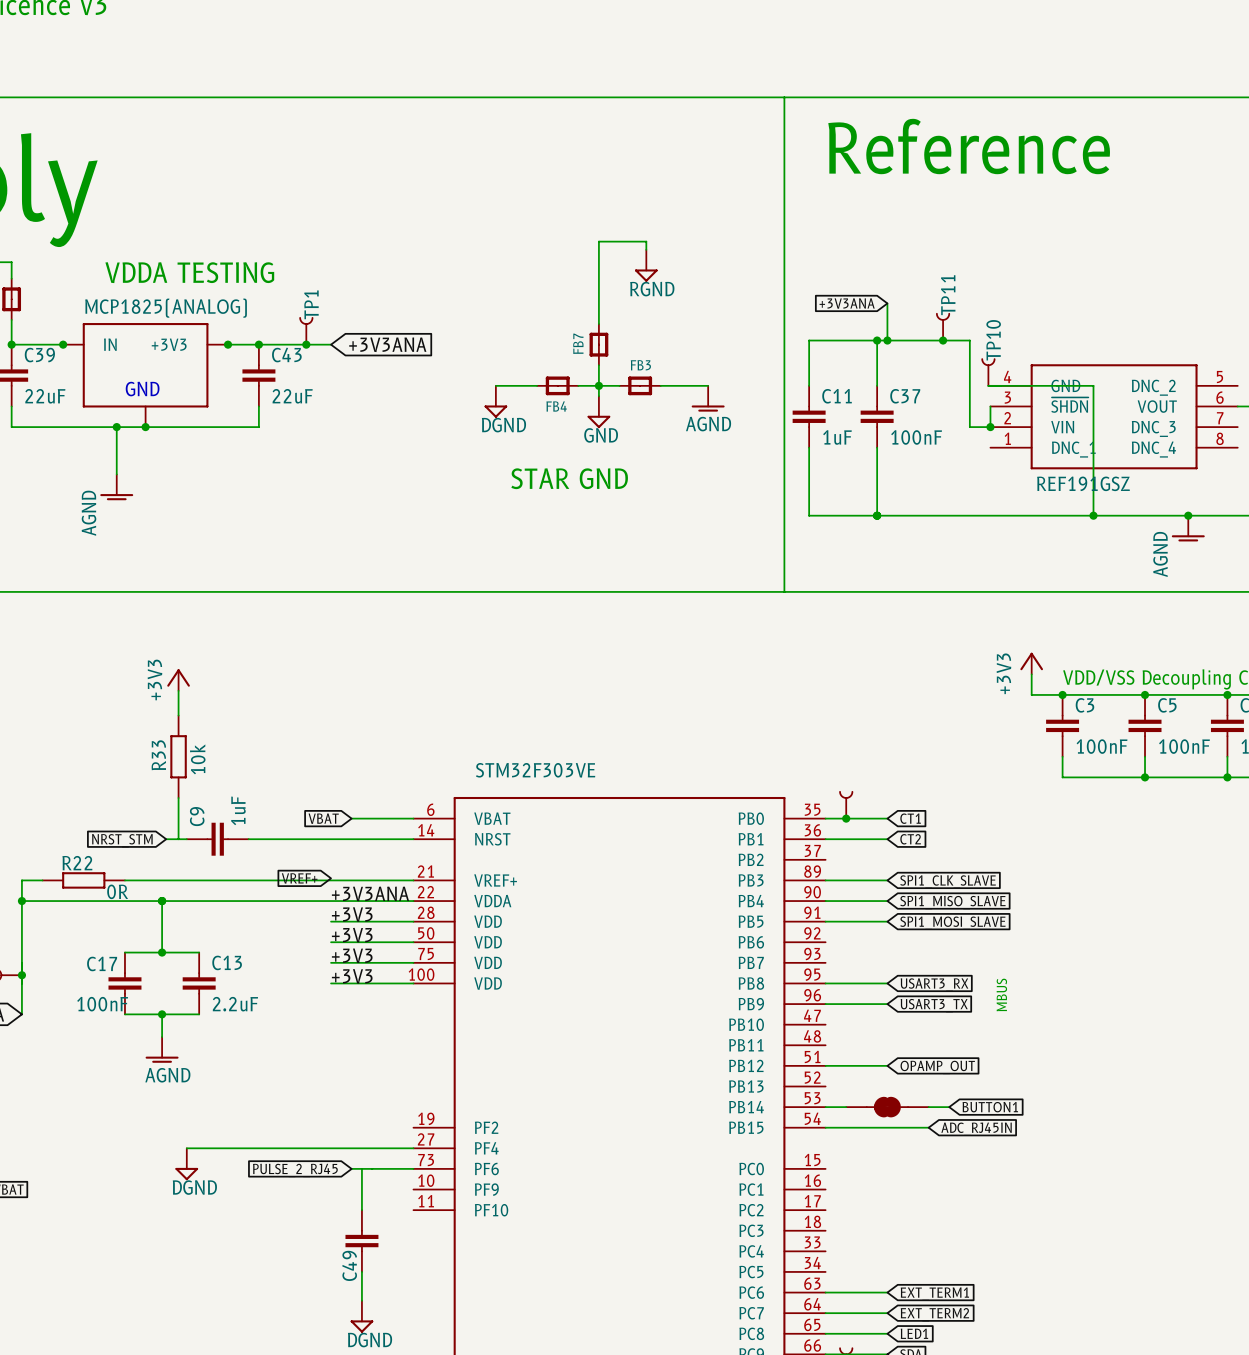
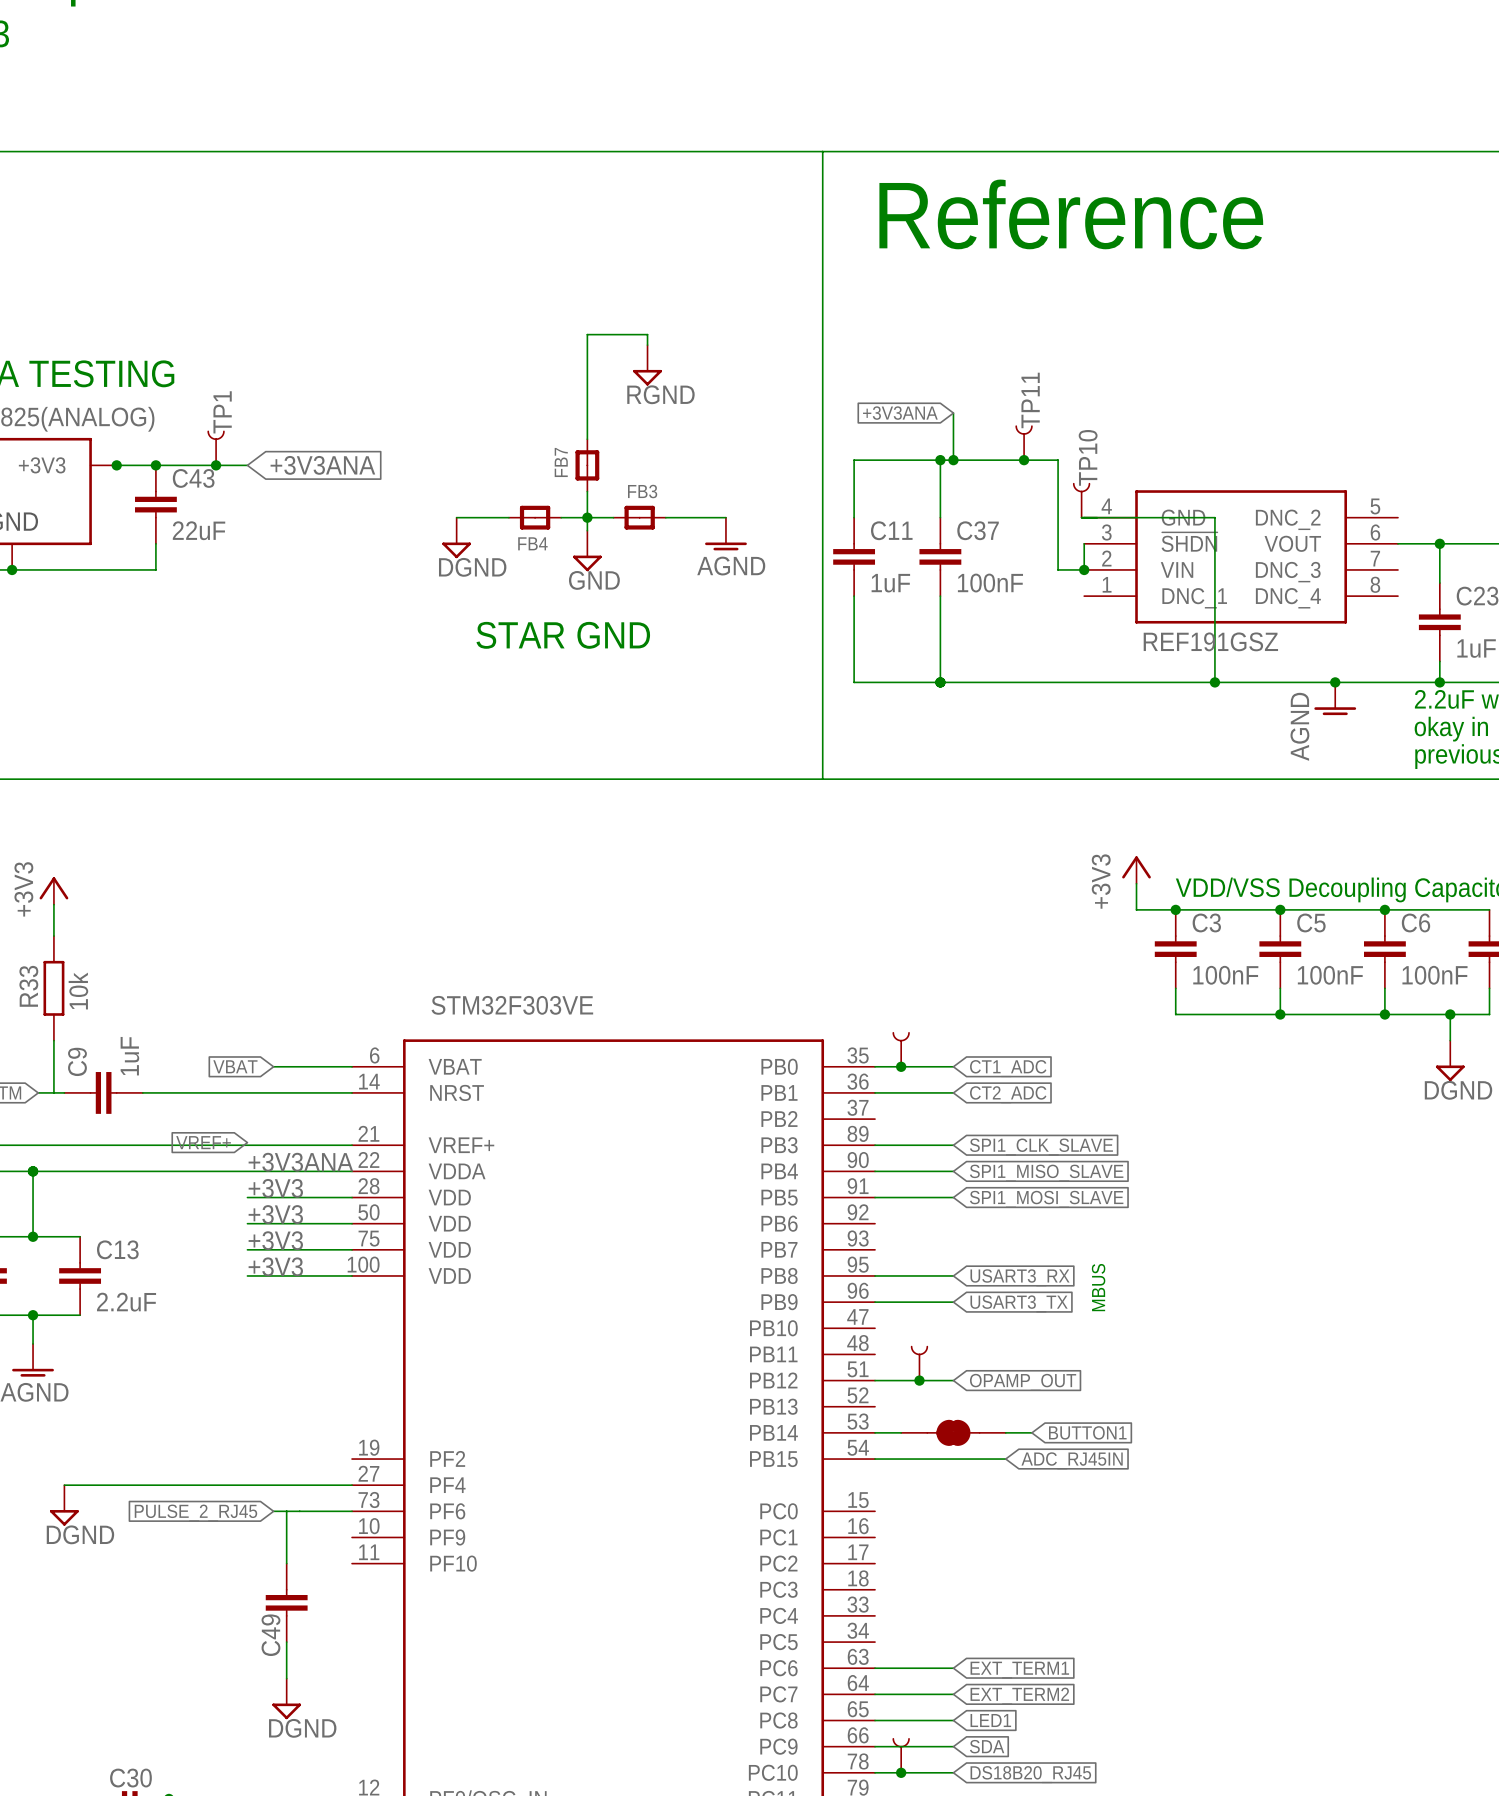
global label: CT1 (910, 818) -> CT1_ADC (1008, 1068)
global label: CT2 (910, 839) -> CT2_ADC (1008, 1094)
part: none -> (919, 1363)
junction: none -> (919, 1380)

